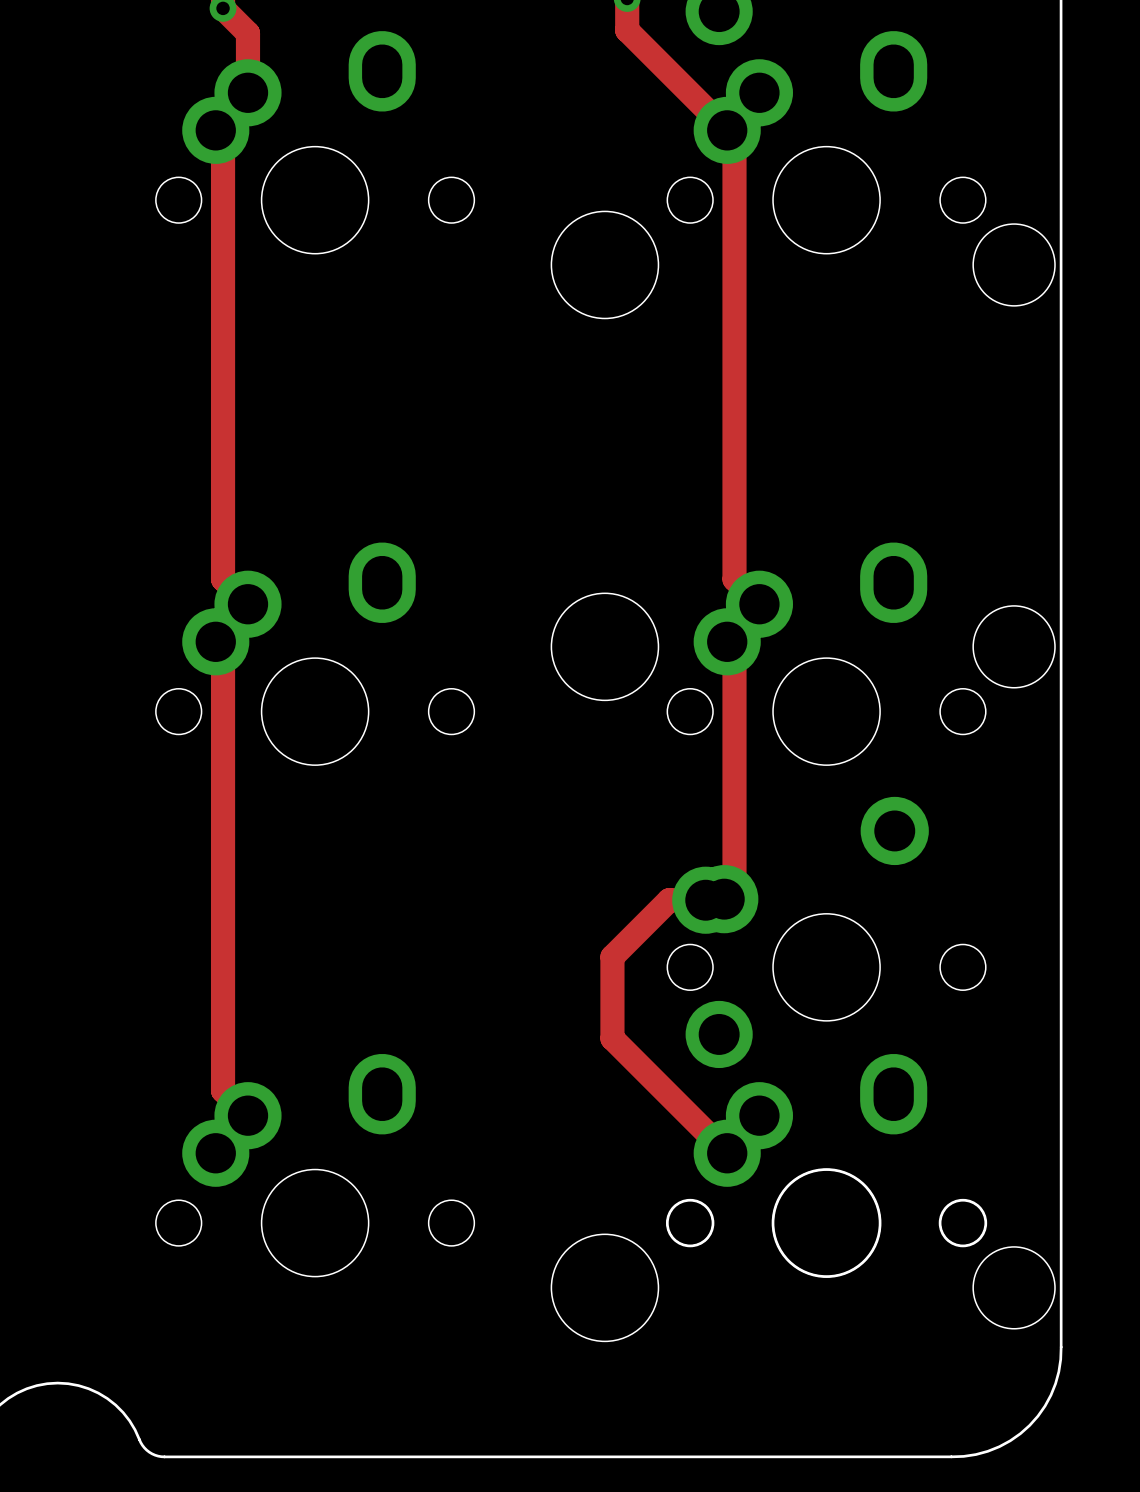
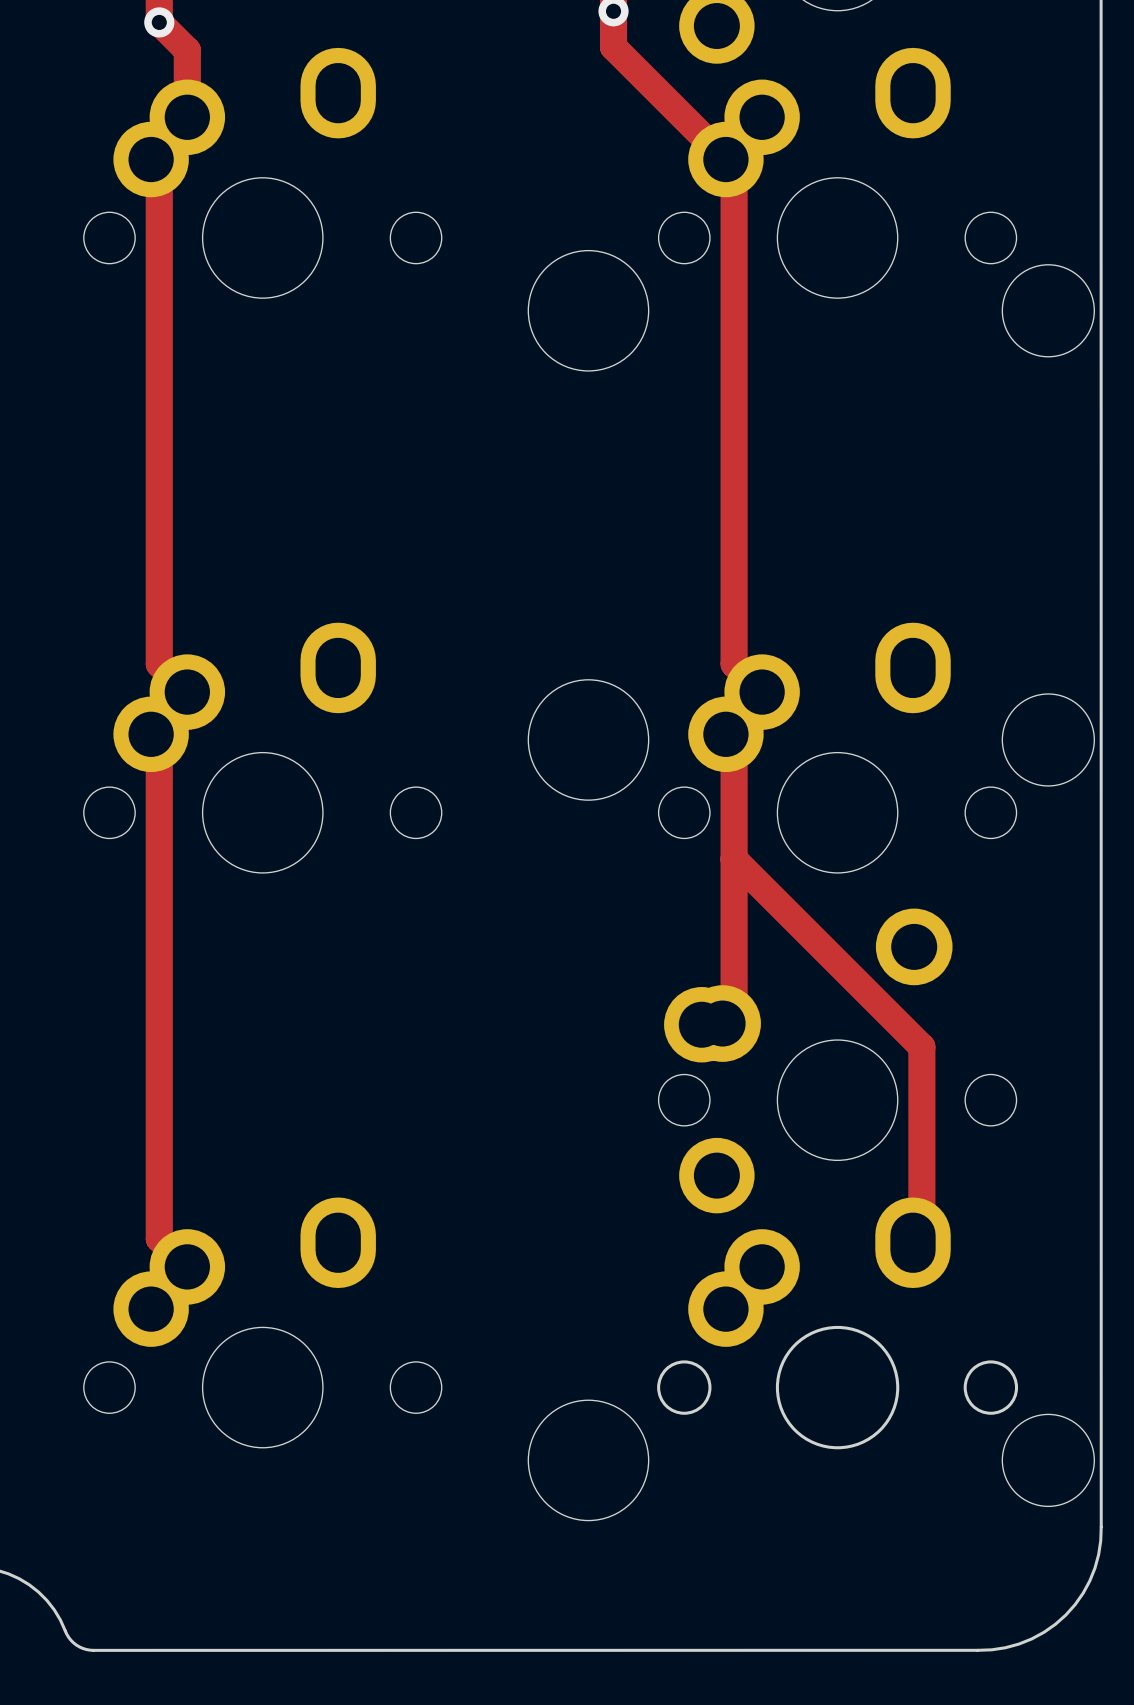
track: none -> (734, 859) (921, 1046) (921, 1233)
track: (705, 900) (669, 900) (612, 956) (612, 1038) (727, 1153) -> none

